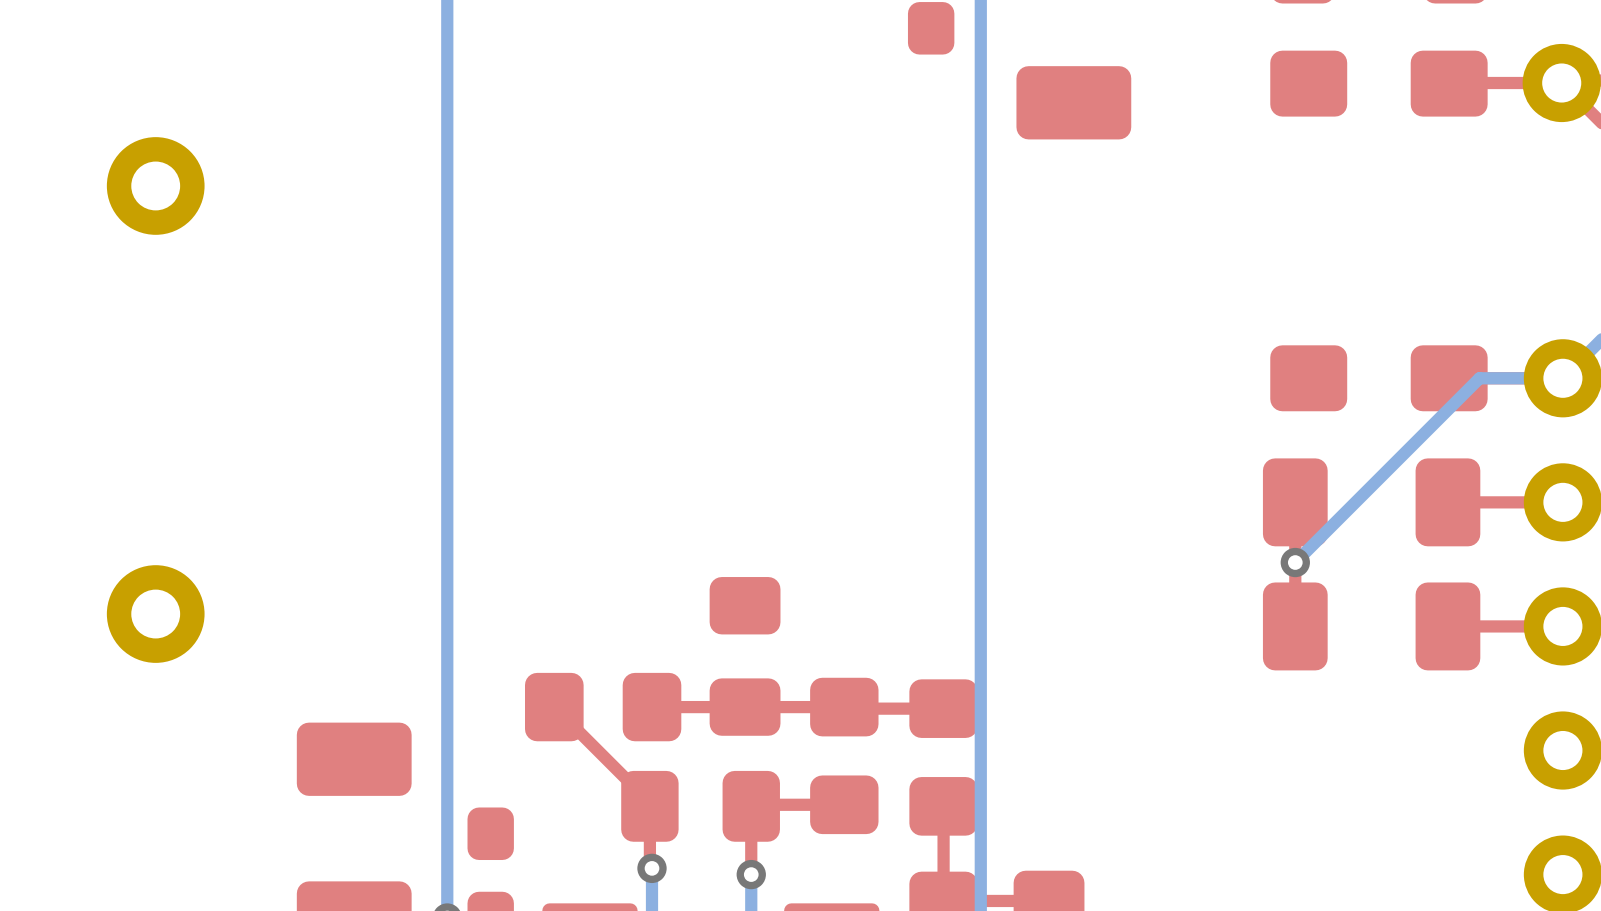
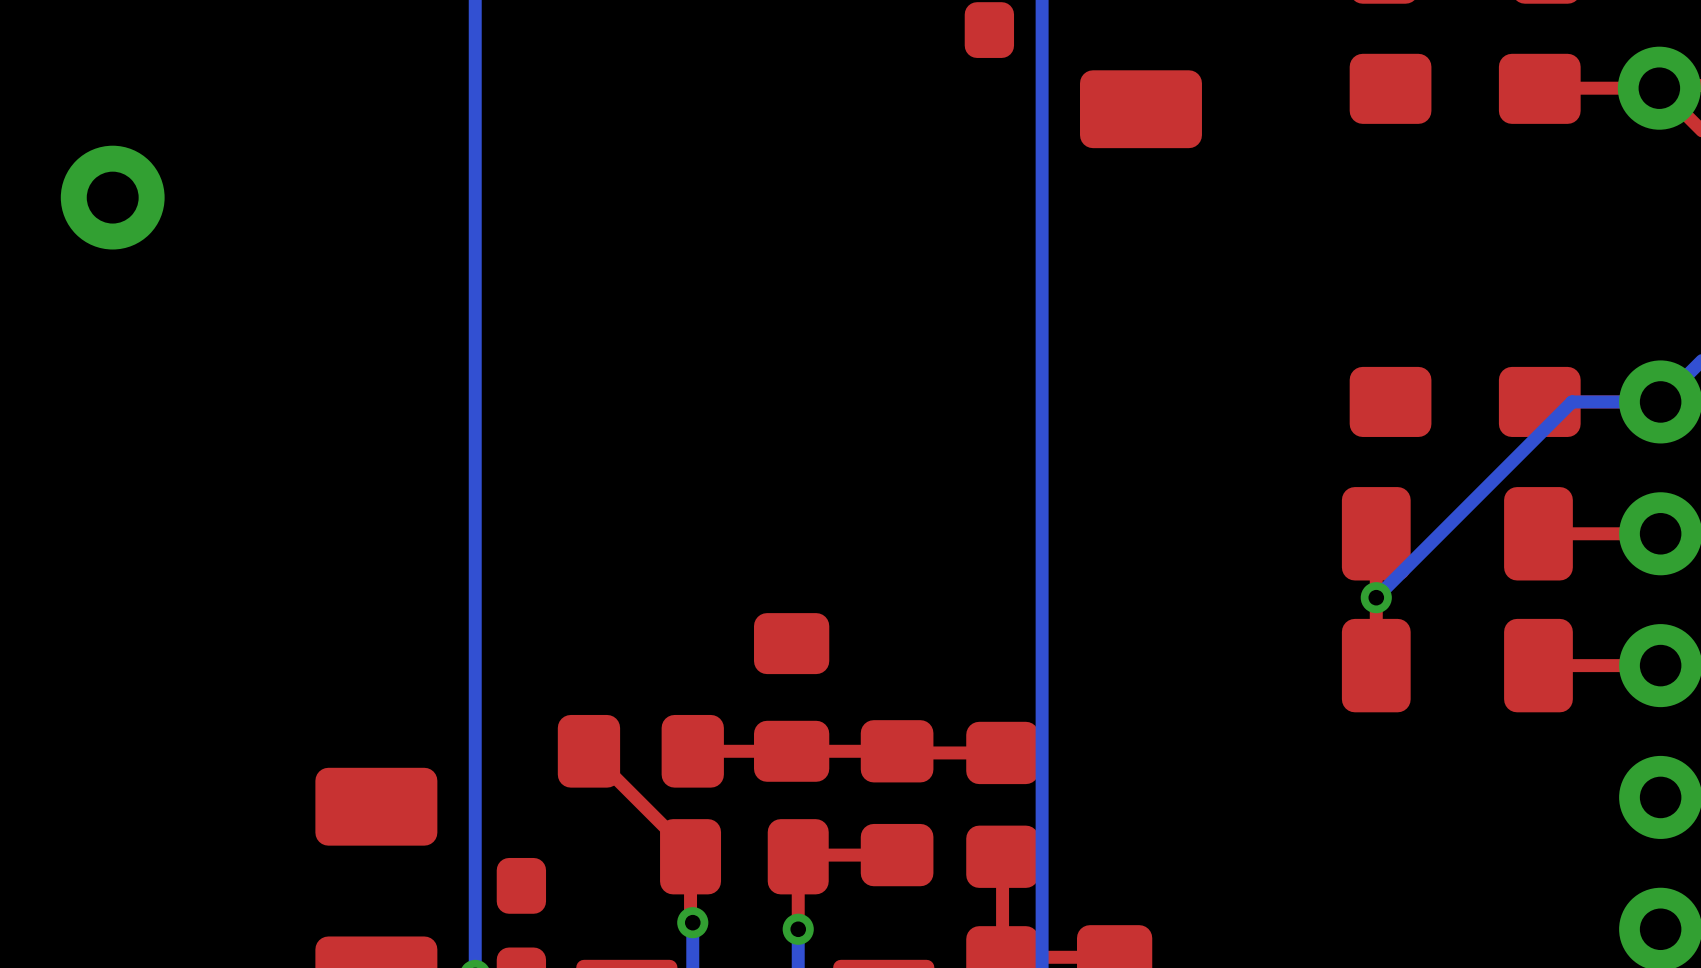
part position: (155, 185) -> (112, 197)
part: (155, 614) -> none

